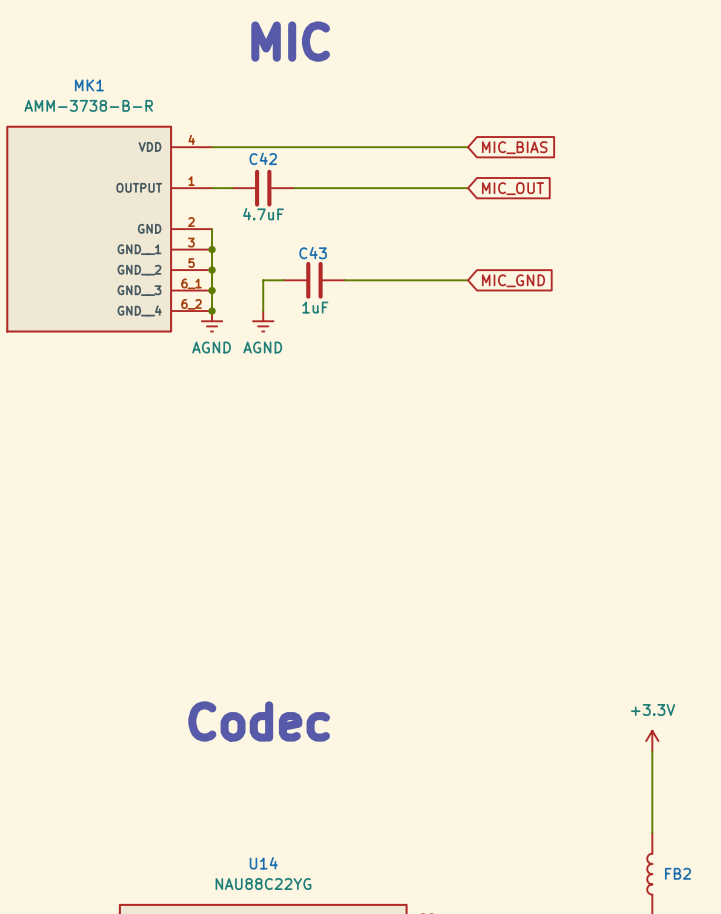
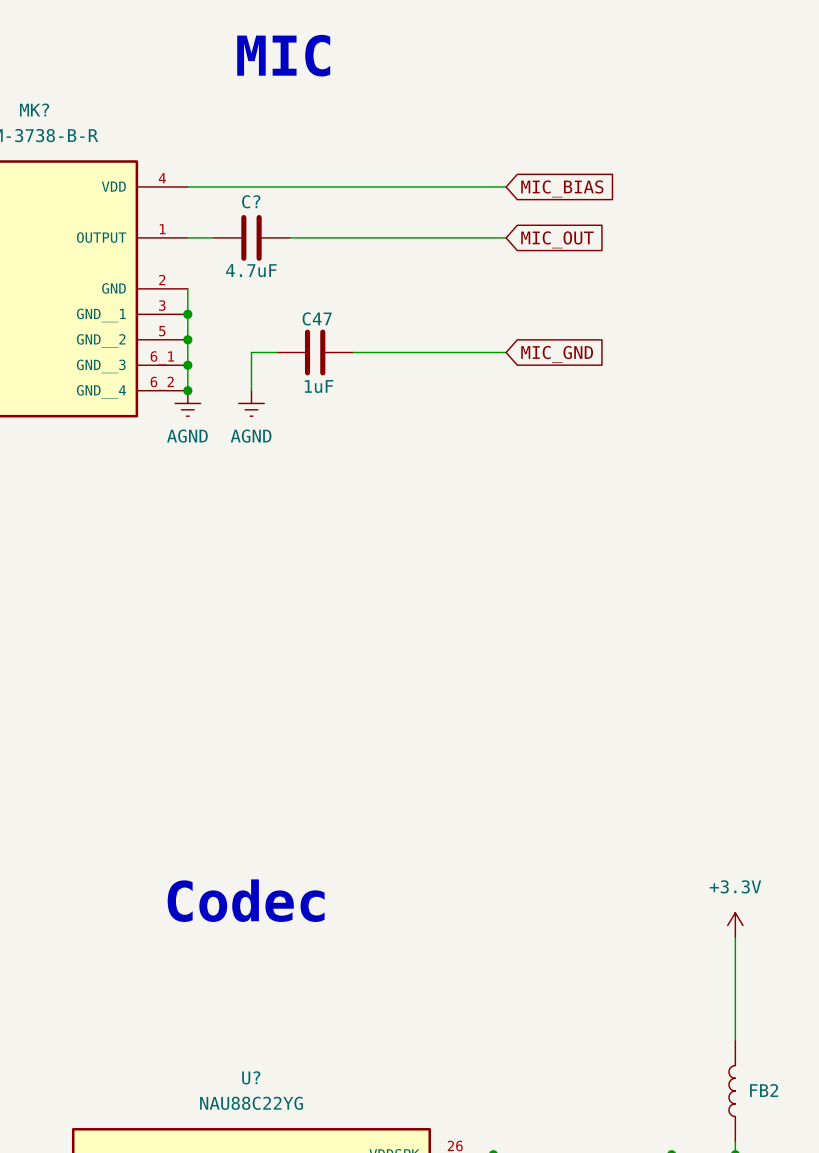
MK1 name: MK1 (89, 85) -> MK? (34, 109)
C42 name: C42 (263, 158) -> C? (251, 201)
C43 name: C43 (313, 253) -> C47 (317, 318)
U14 name: U14 (263, 863) -> U? (251, 1077)

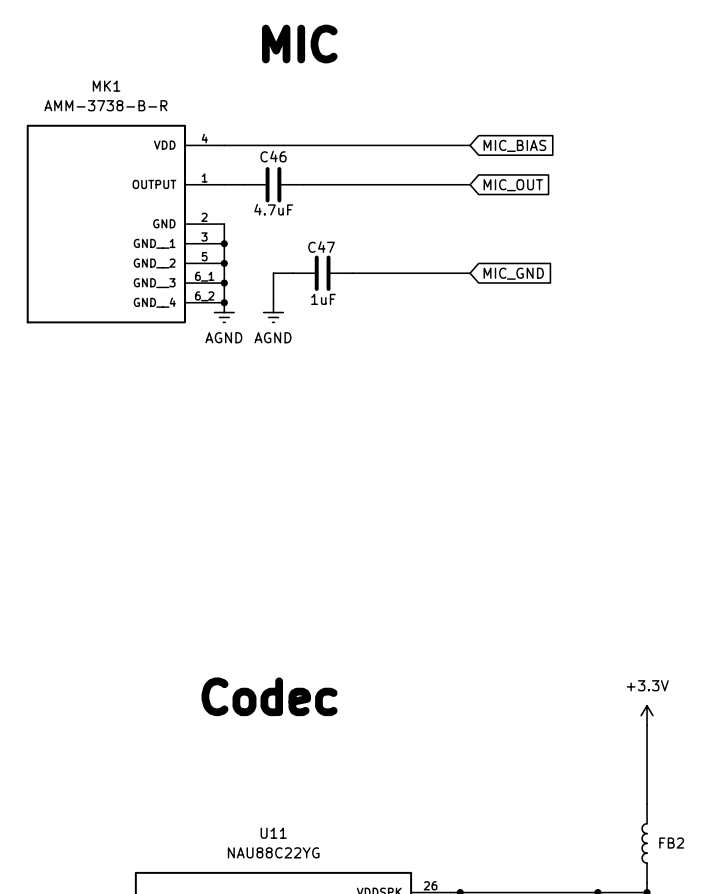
MK? name: MK? (34, 109) -> MK1 (106, 86)
C? name: C? (251, 201) -> C46 (273, 156)
U? name: U? (251, 1077) -> U11 (273, 833)

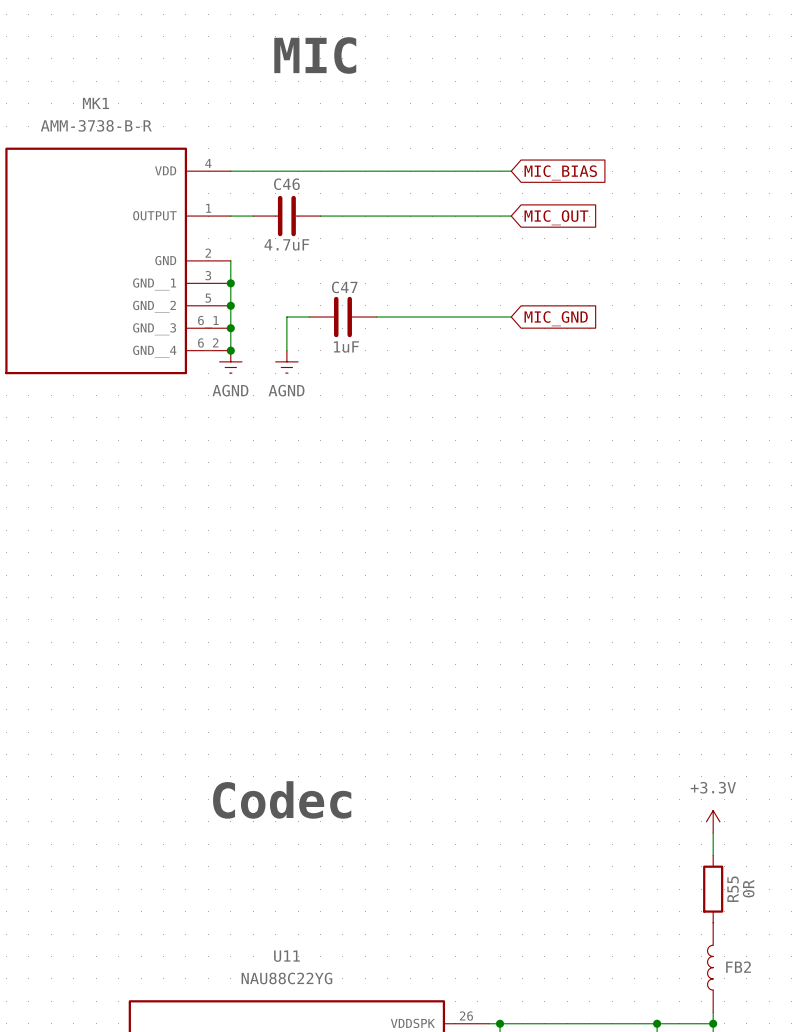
wire: (647, 745) (647, 804) -> none
R55: none -> 0R (713, 889)

